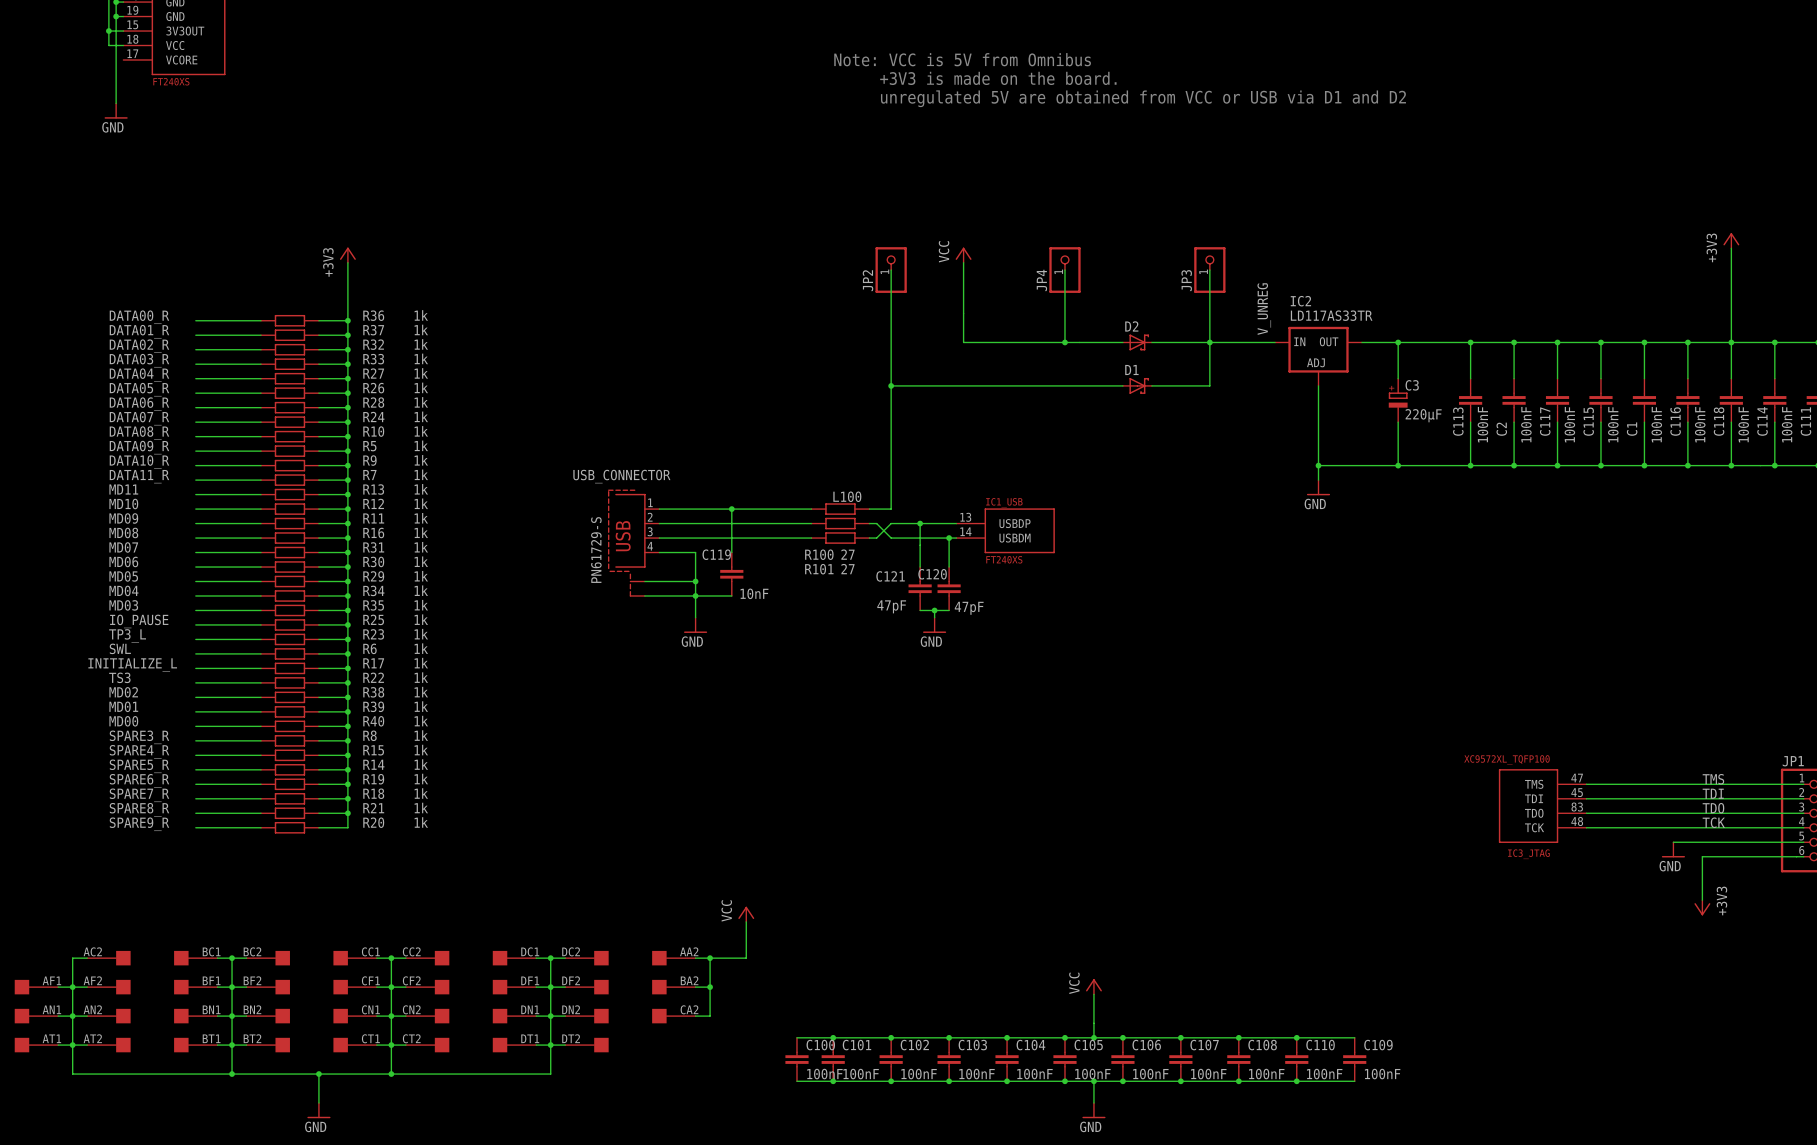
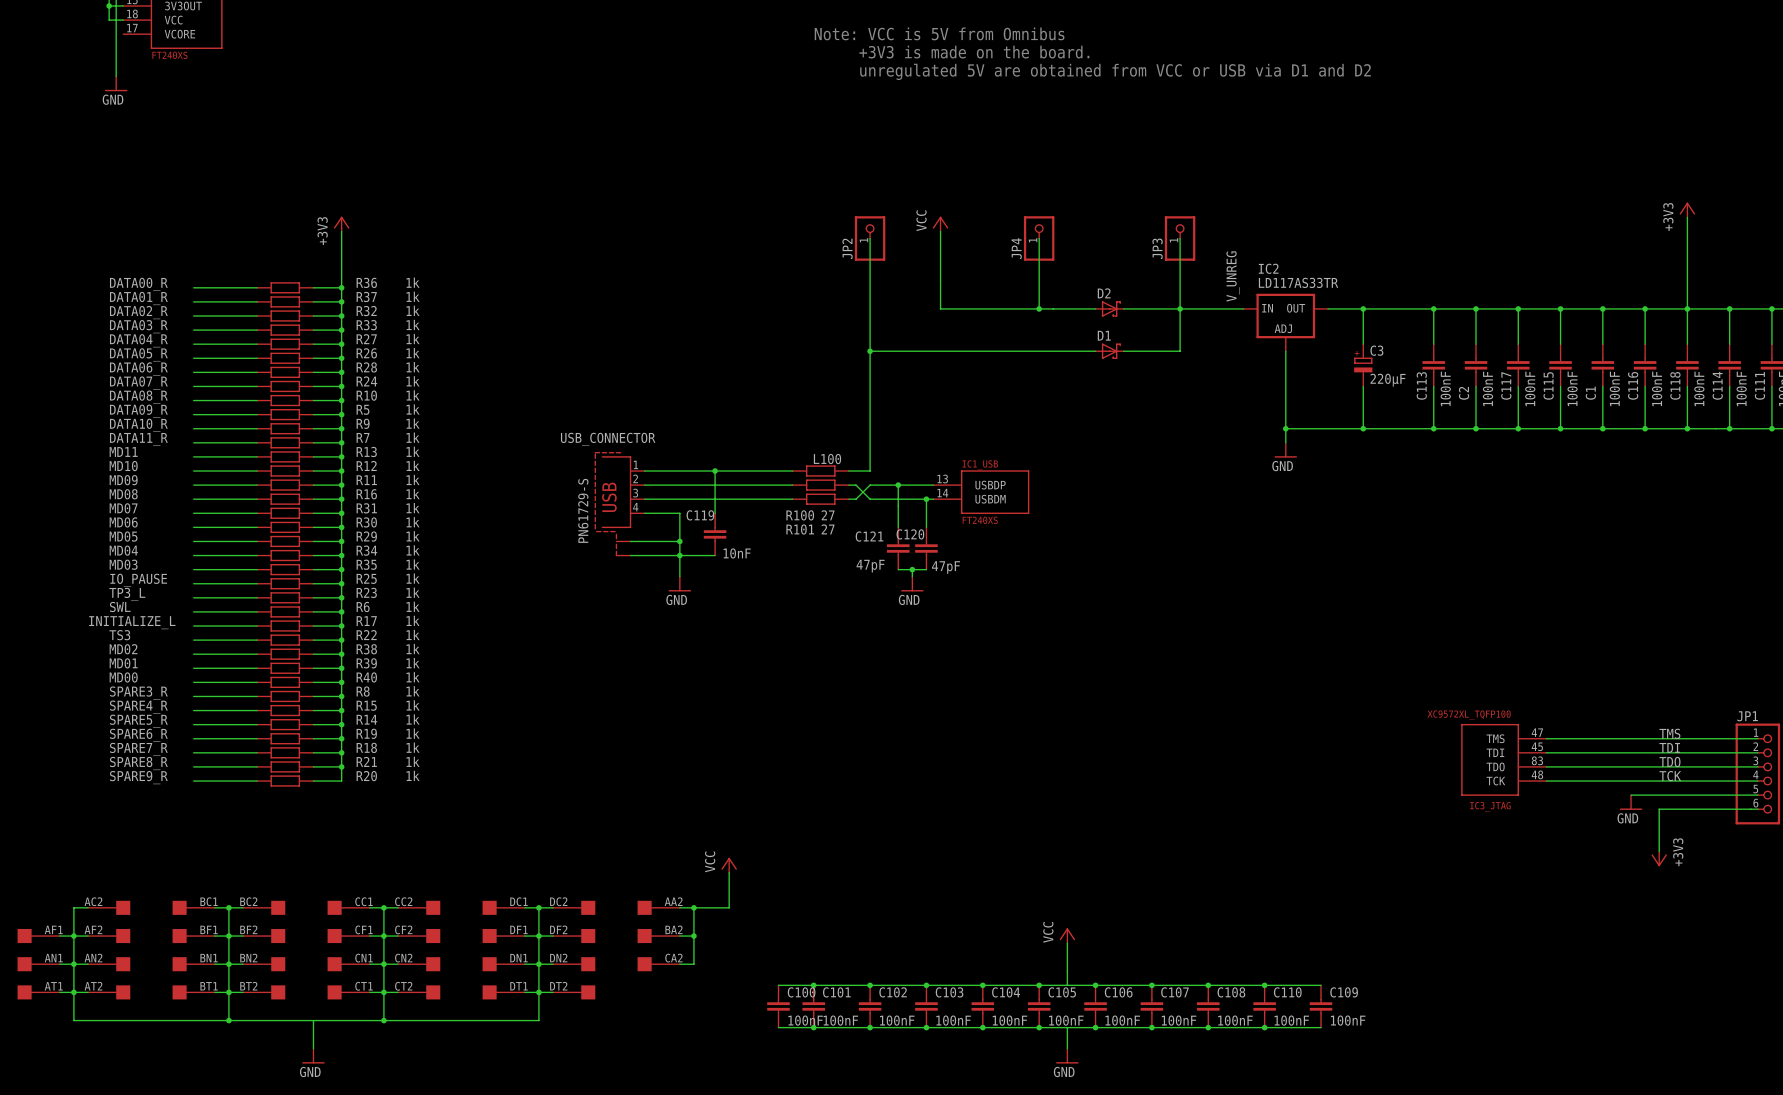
junction: (1093, 1037) -> none
junction: (318, 1074) -> none
junction: (1093, 1081) -> none

